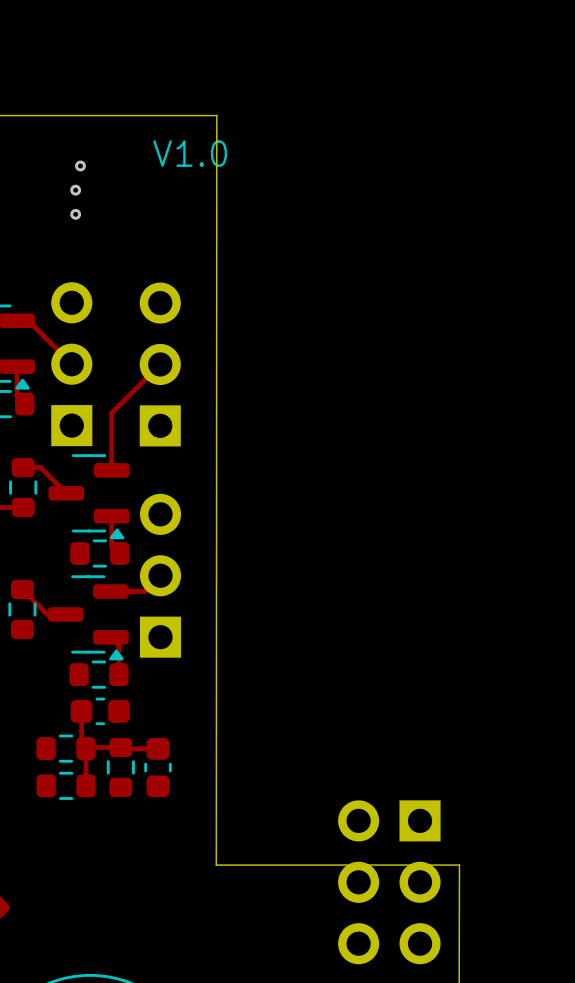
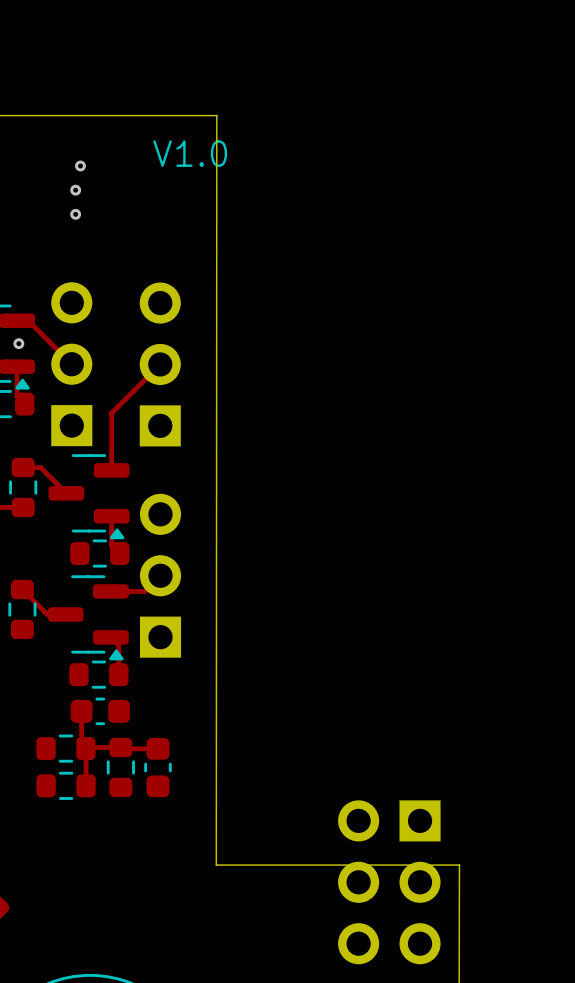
via: none -> (18, 343)

